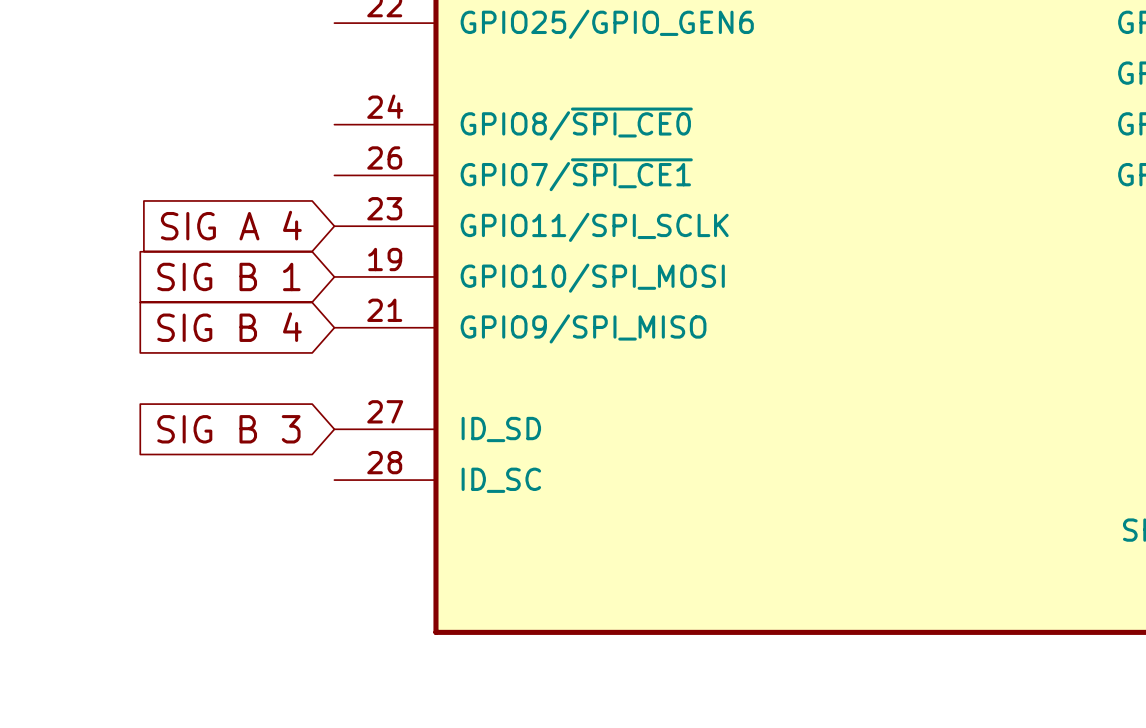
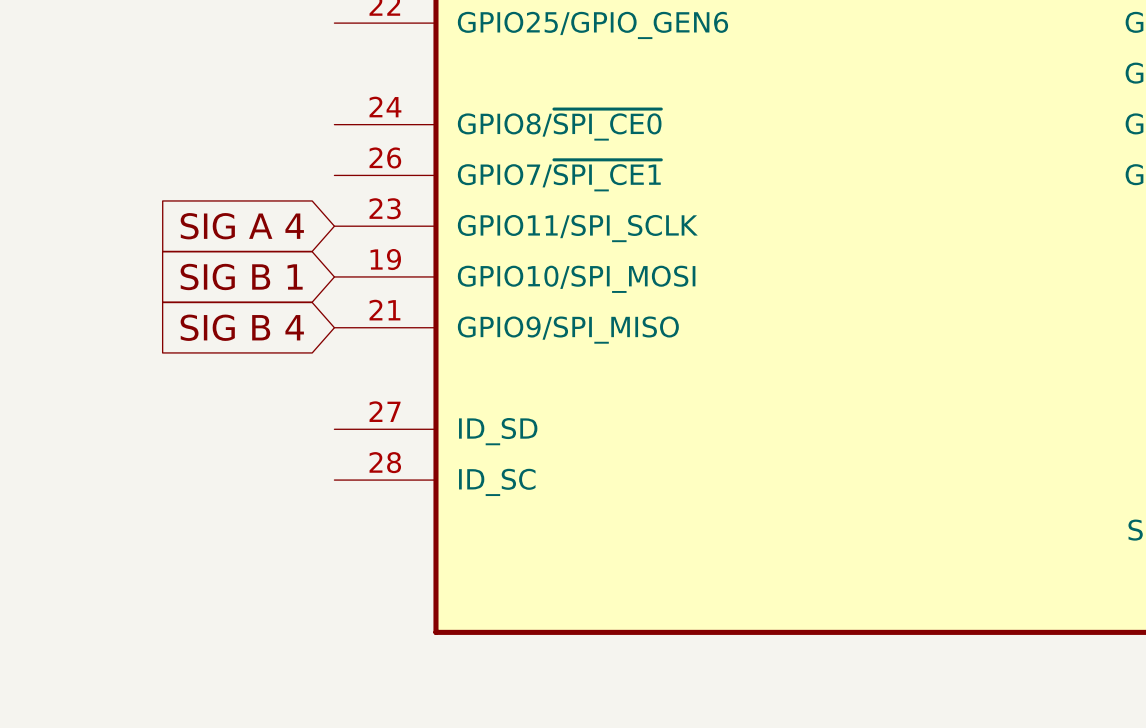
global label: SIG B 3 (228, 429) -> none

